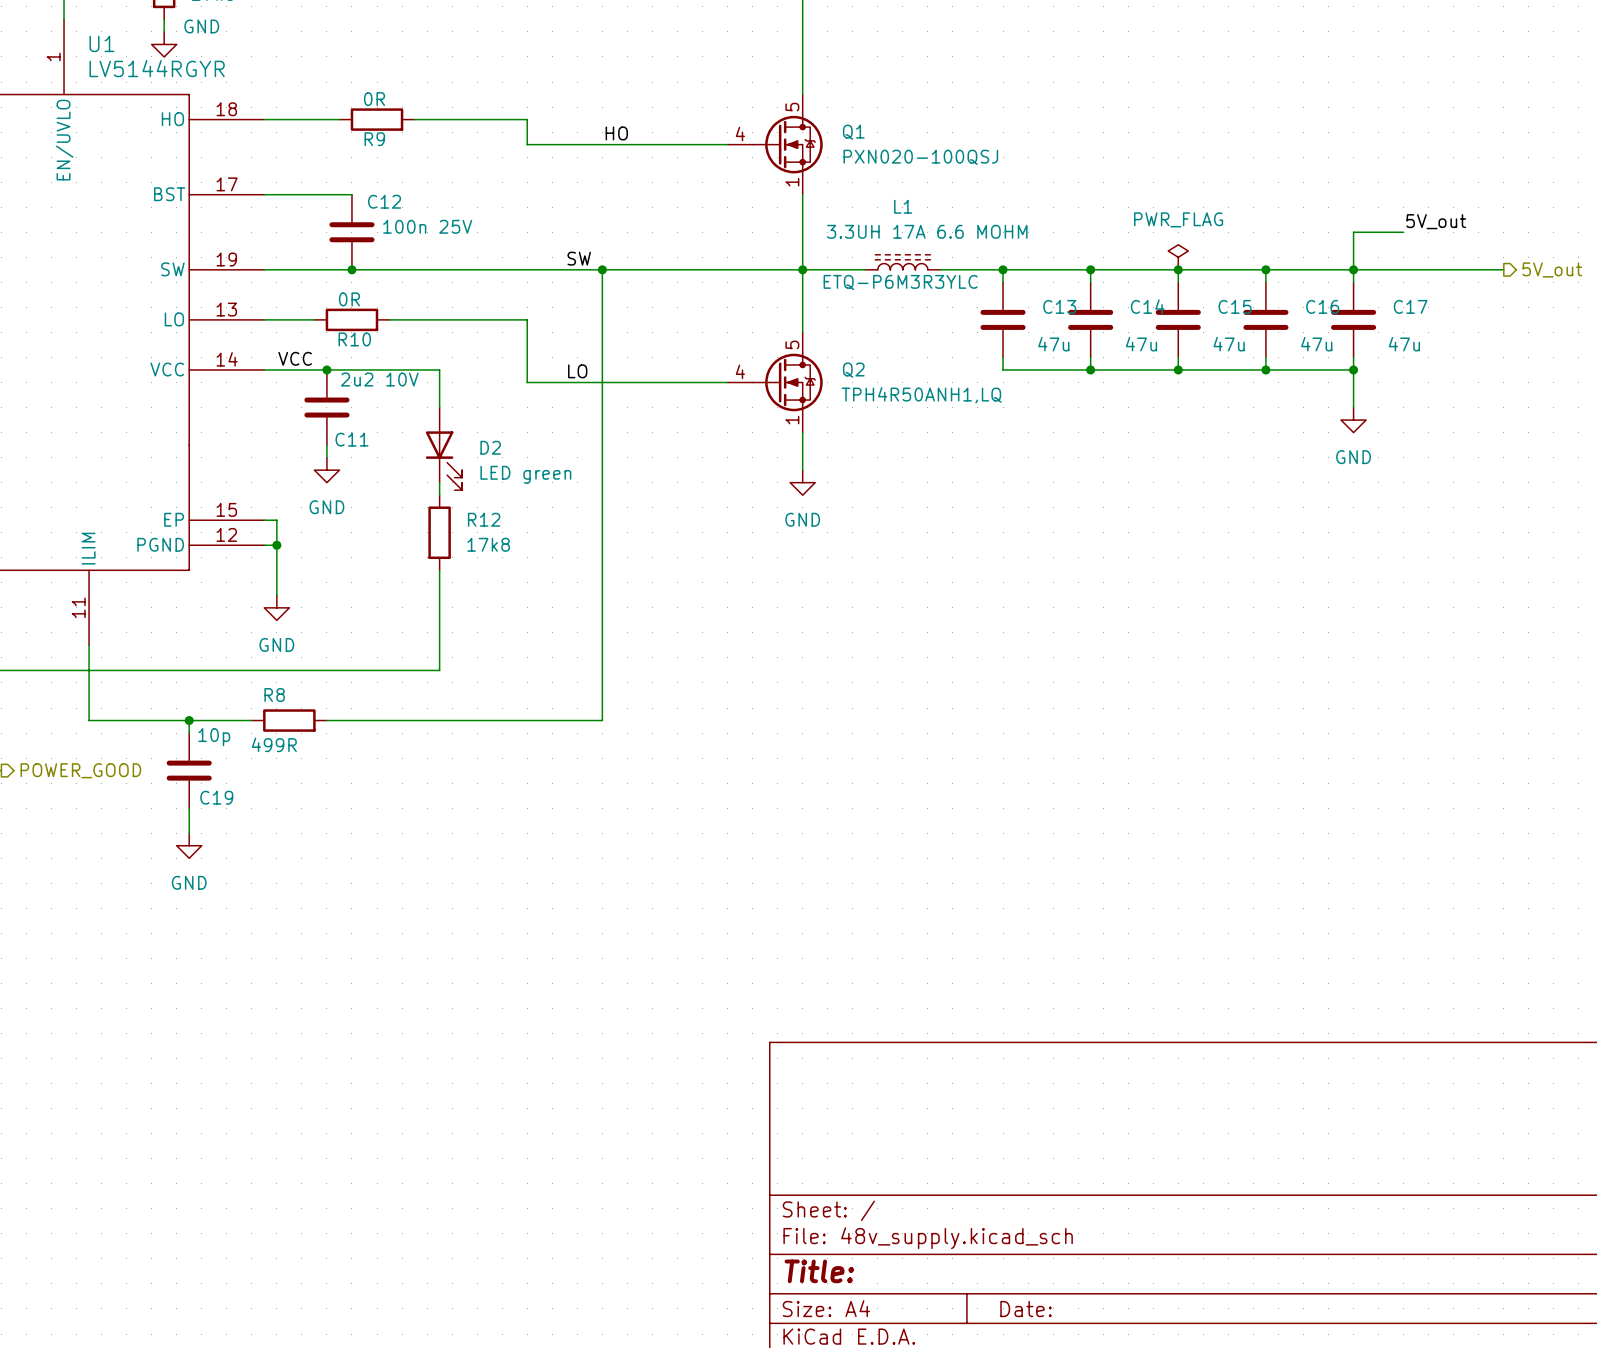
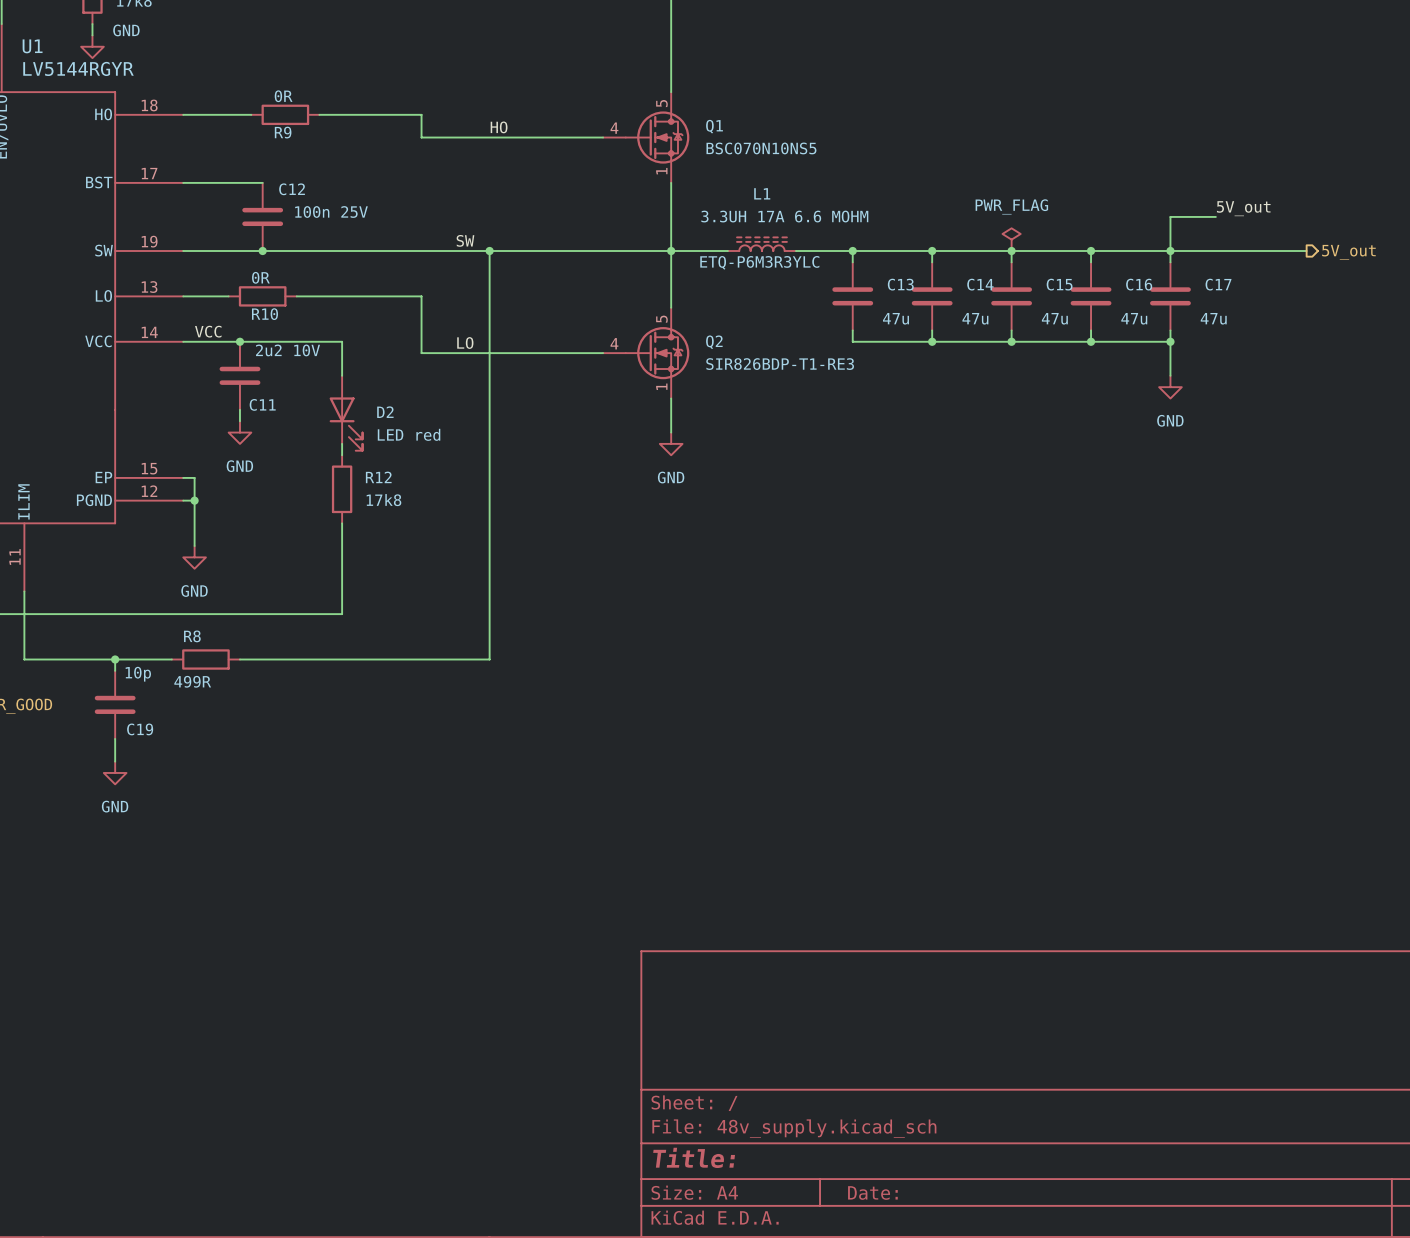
Q1 value: PXN020-100QSJ (920, 157) -> BSC070N10NS5 (761, 148)
Q2 value: TPH4R50ANH1,LQ (921, 395) -> SIR826BDP-T1-RE3 (780, 364)
D2 value: LED green (525, 474) -> LED red (409, 434)

